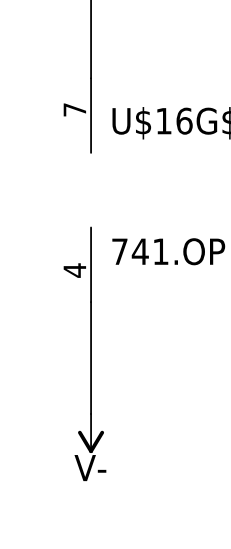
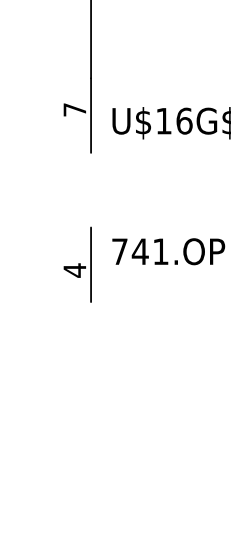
wire: (91, 302) (91, 413) -> none
power symbol: V- (91, 433) -> none

